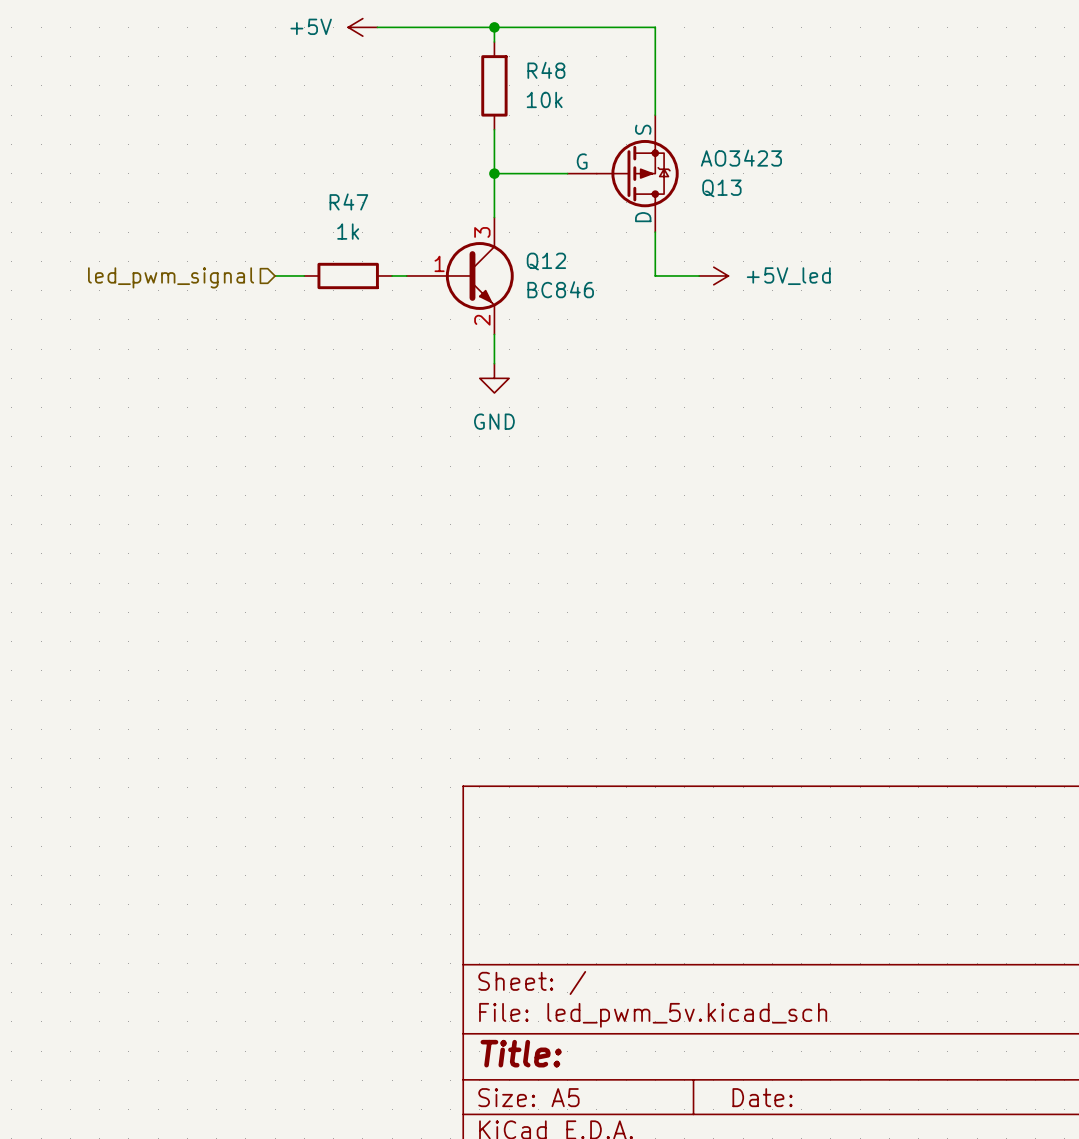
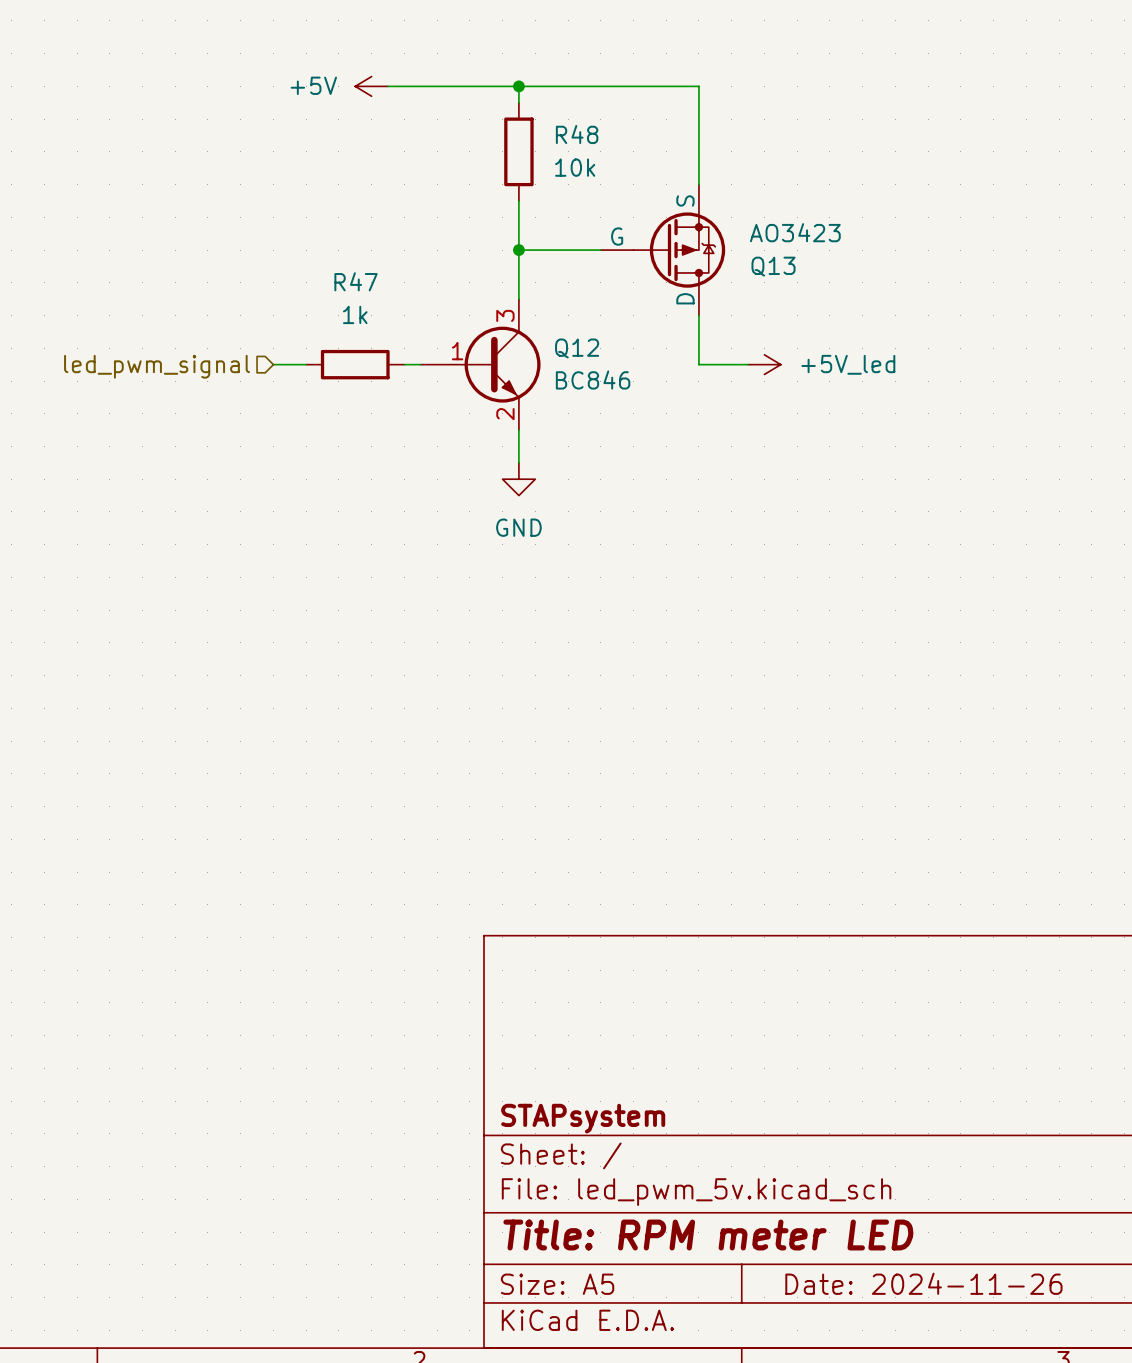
title block: none -> STAPsystem (583, 1118)
title block: Title: (521, 1053) -> Title: RPM meter LED (708, 1235)
title block: Date: (762, 1097) -> Date: 2024-11-26 (923, 1283)

